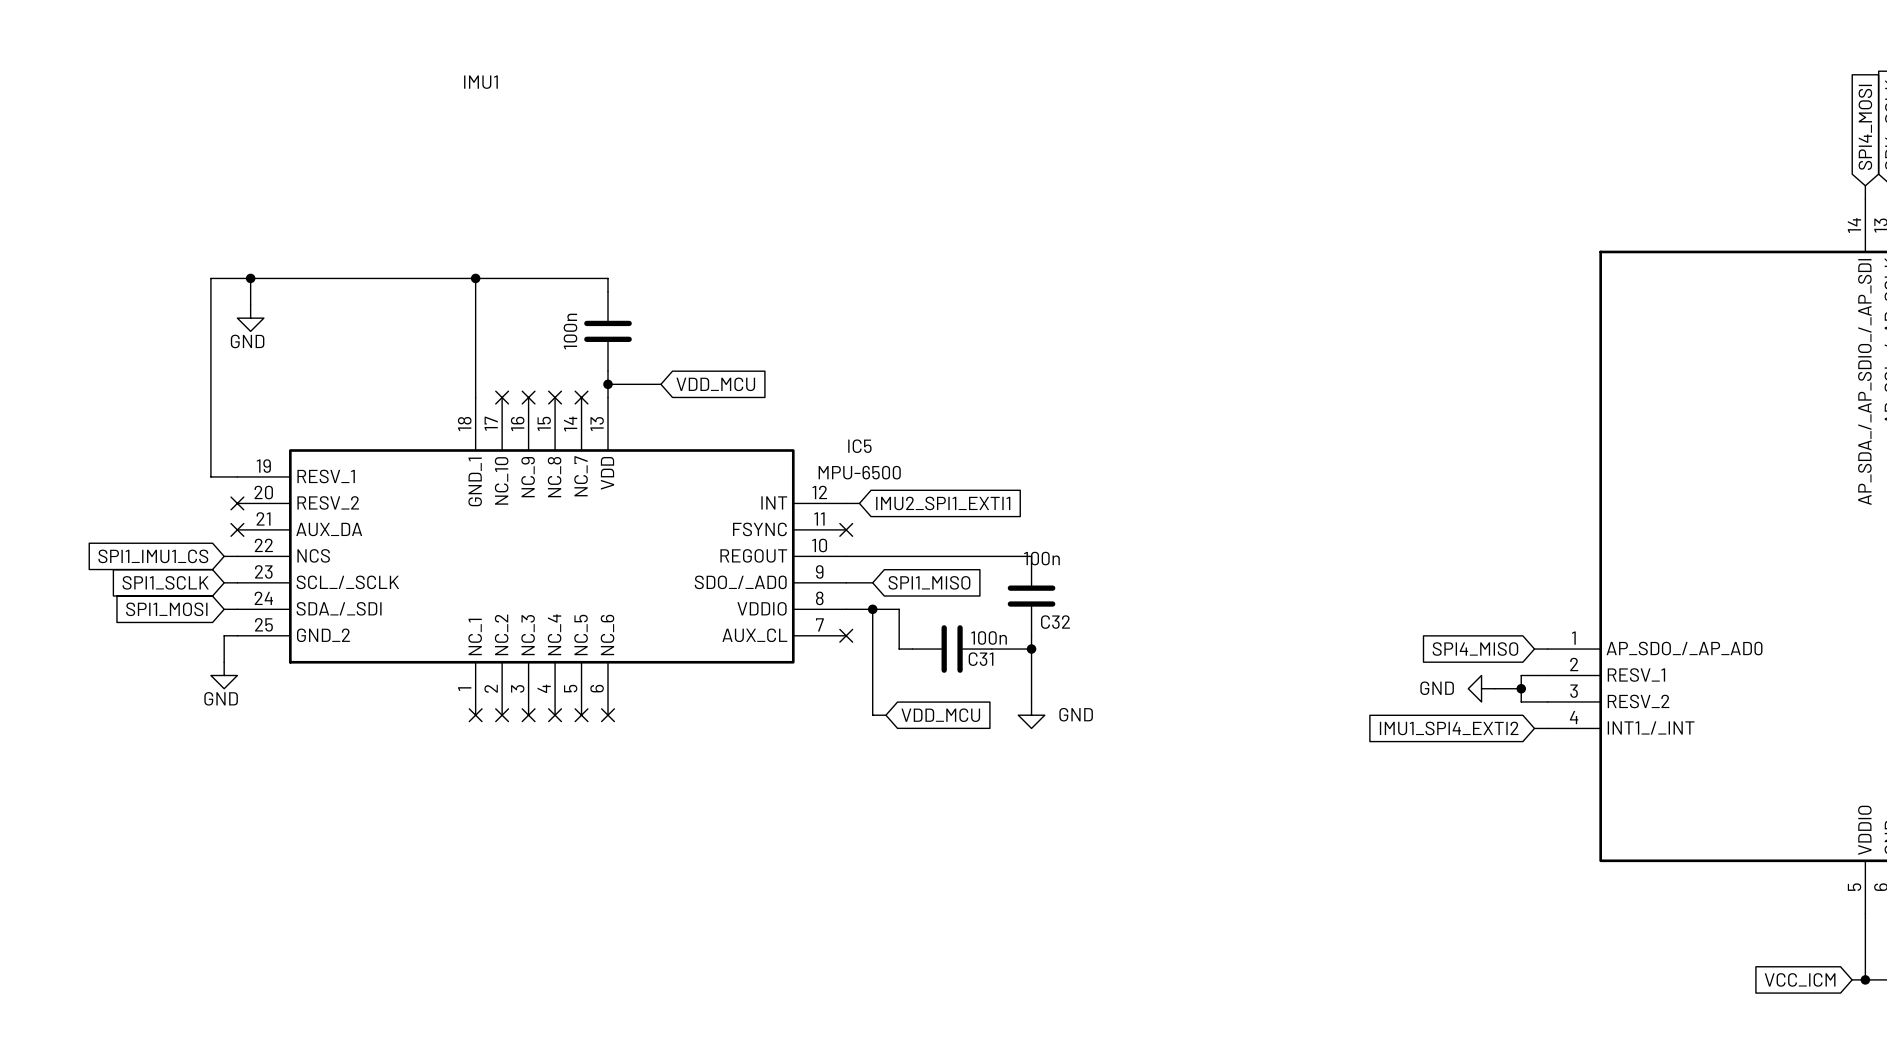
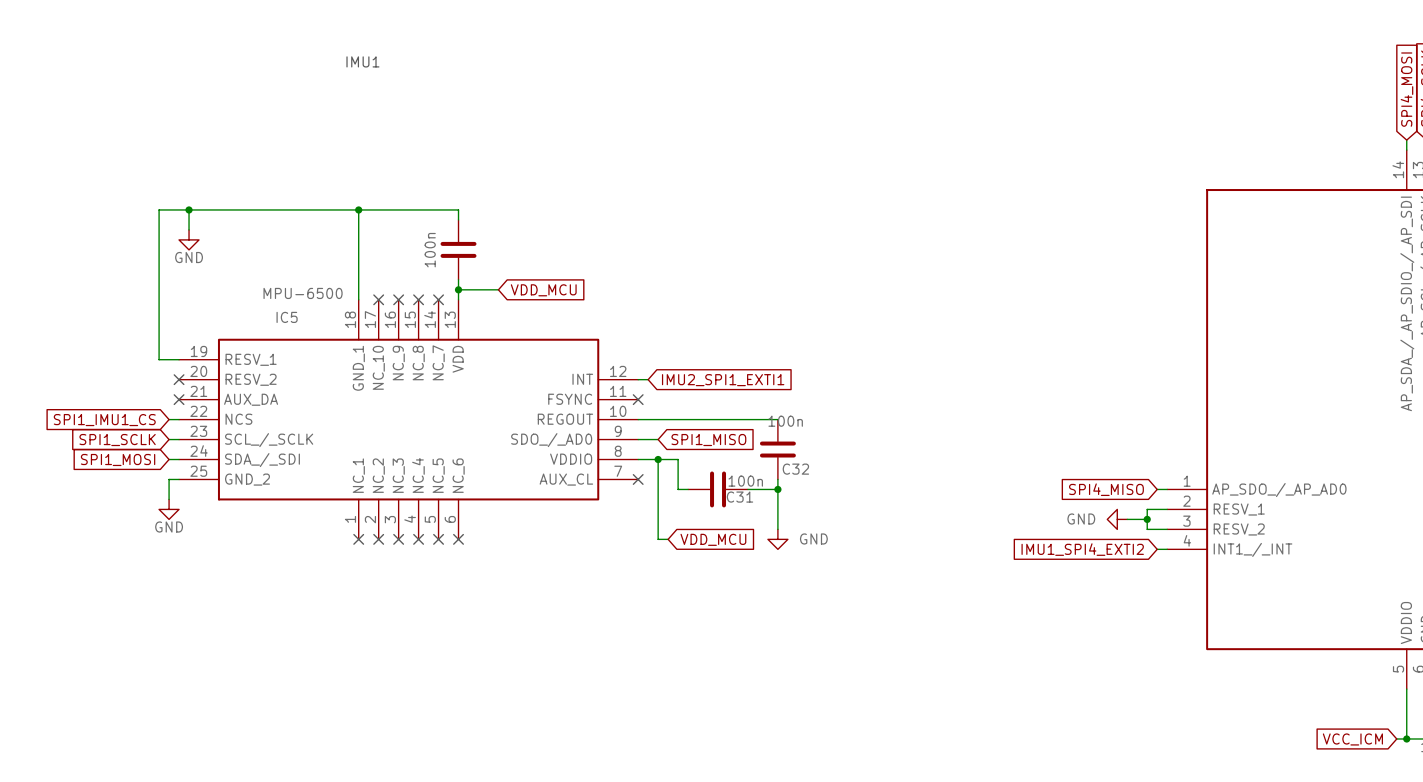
IC5 name position: IC5 (859, 446) -> IC5 (287, 317)
IC5 value position: MPU-6500 (859, 472) -> MPU-6500 (303, 293)

